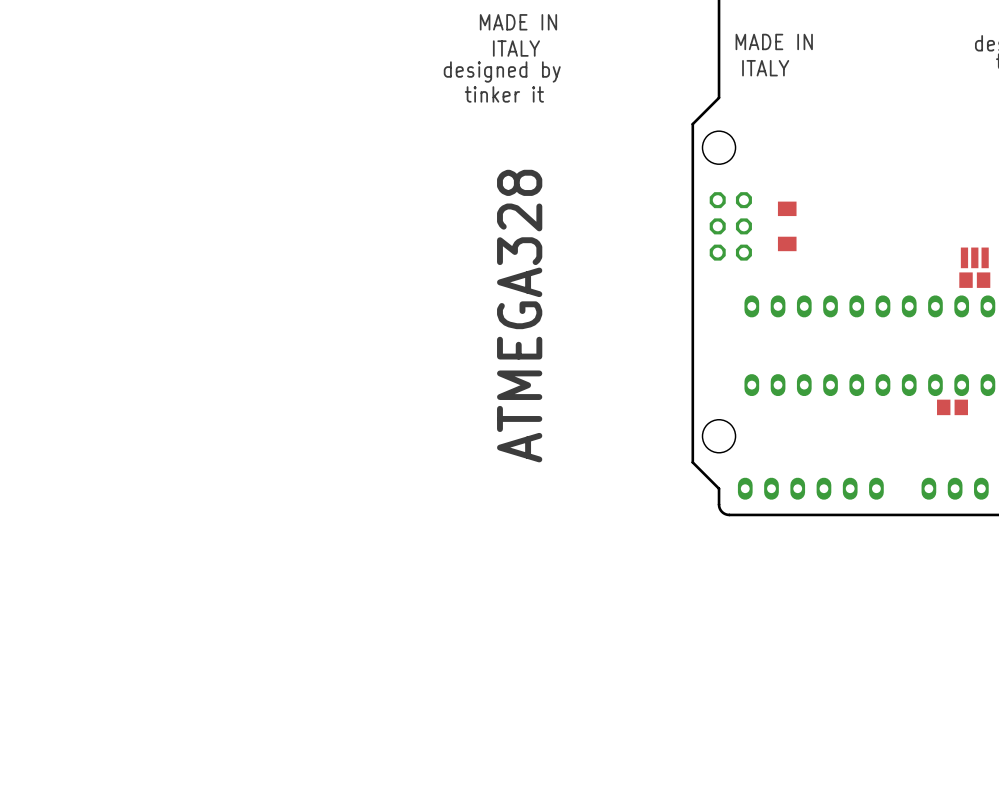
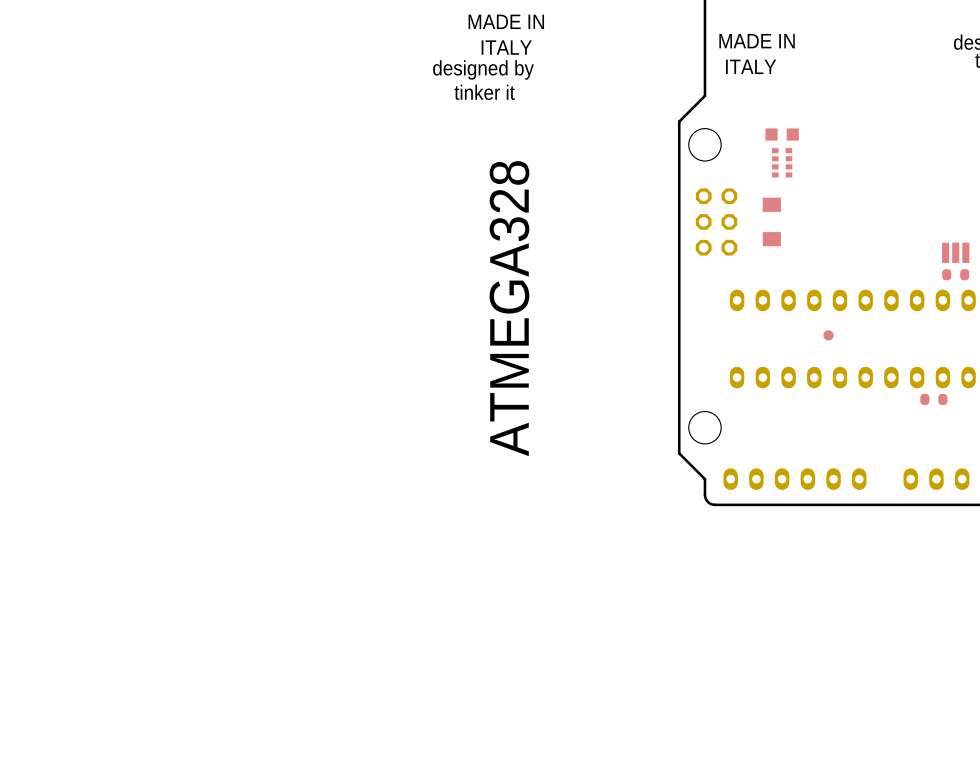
part: none -> (782, 134)
part: none -> (782, 162)
part footprint: [959, 272, 991, 288] -> [942, 269, 970, 281]
part: none -> (828, 335)
part footprint: [937, 399, 968, 416] -> [920, 393, 948, 405]

